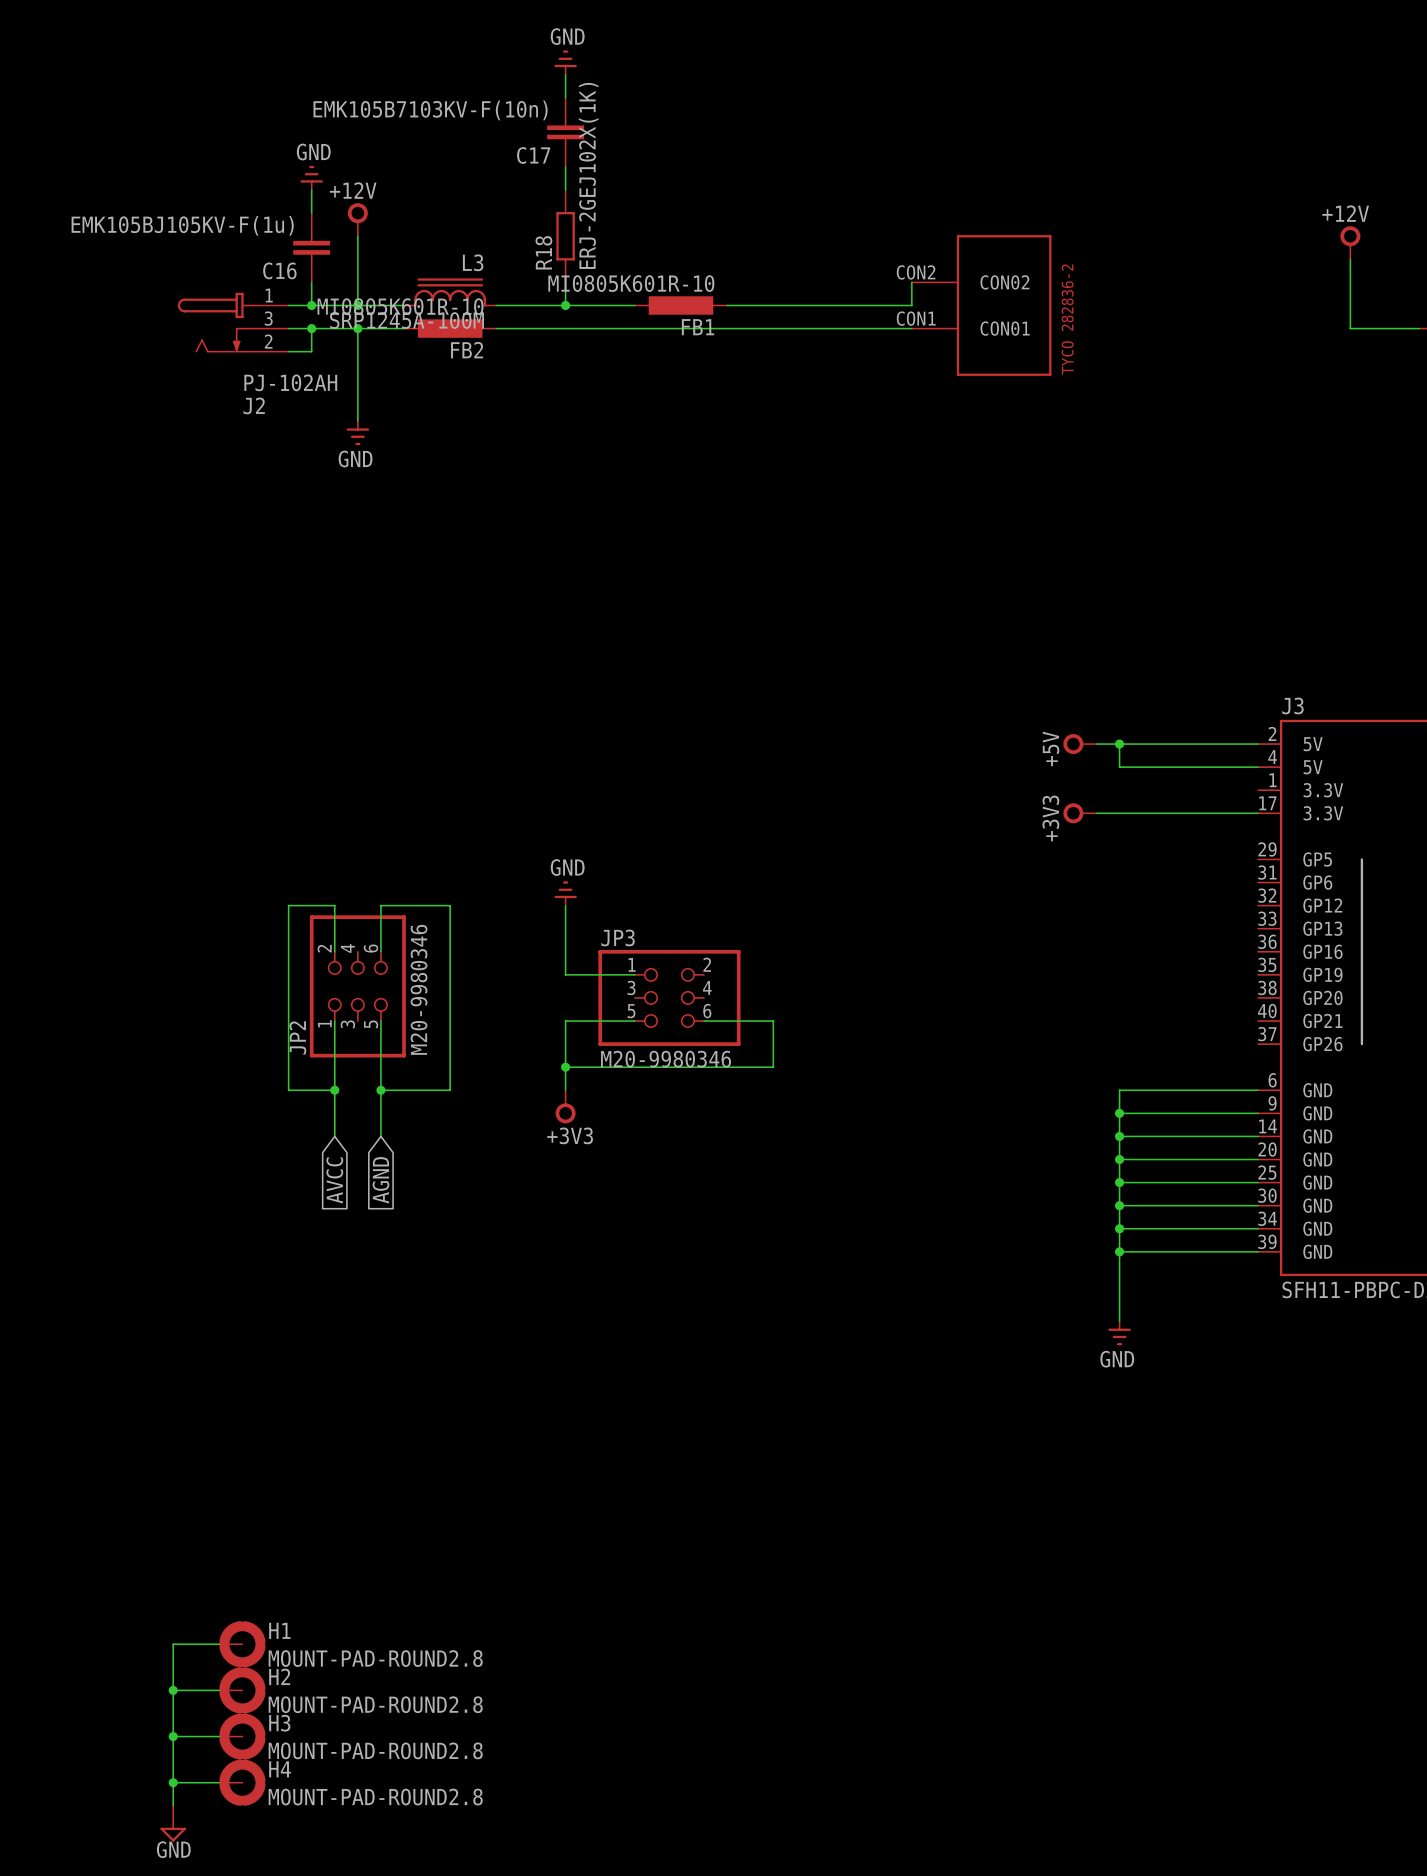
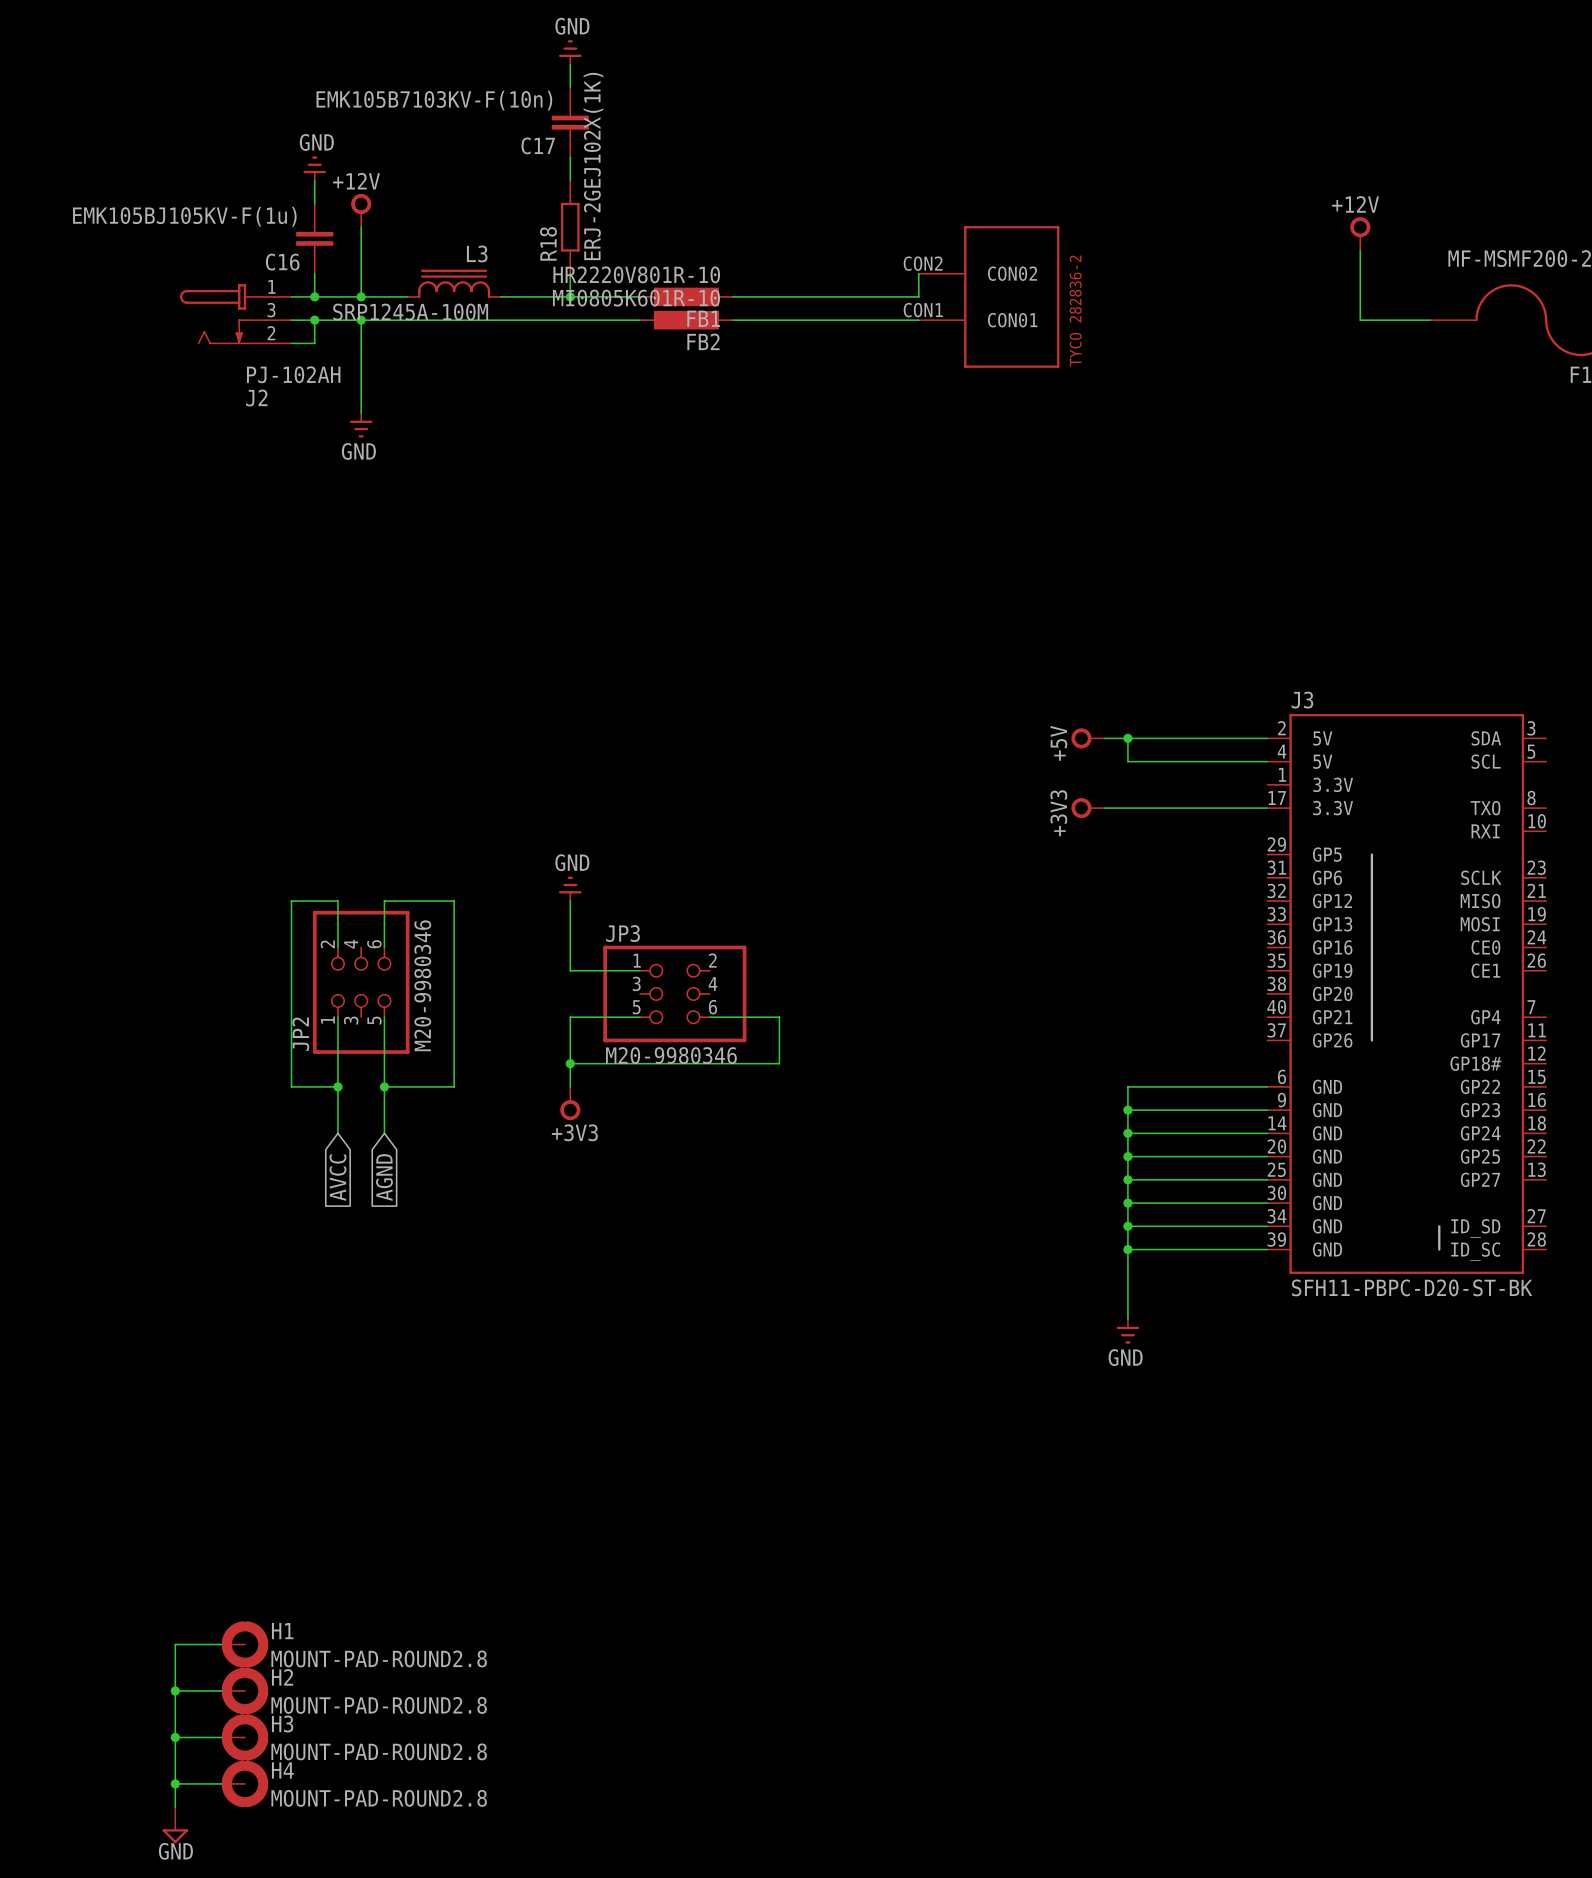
FB1 value: MI0805K601R-10 (631, 283) -> HR2220V801R-10 (636, 274)
FB2 position: (450, 328) -> (686, 320)

